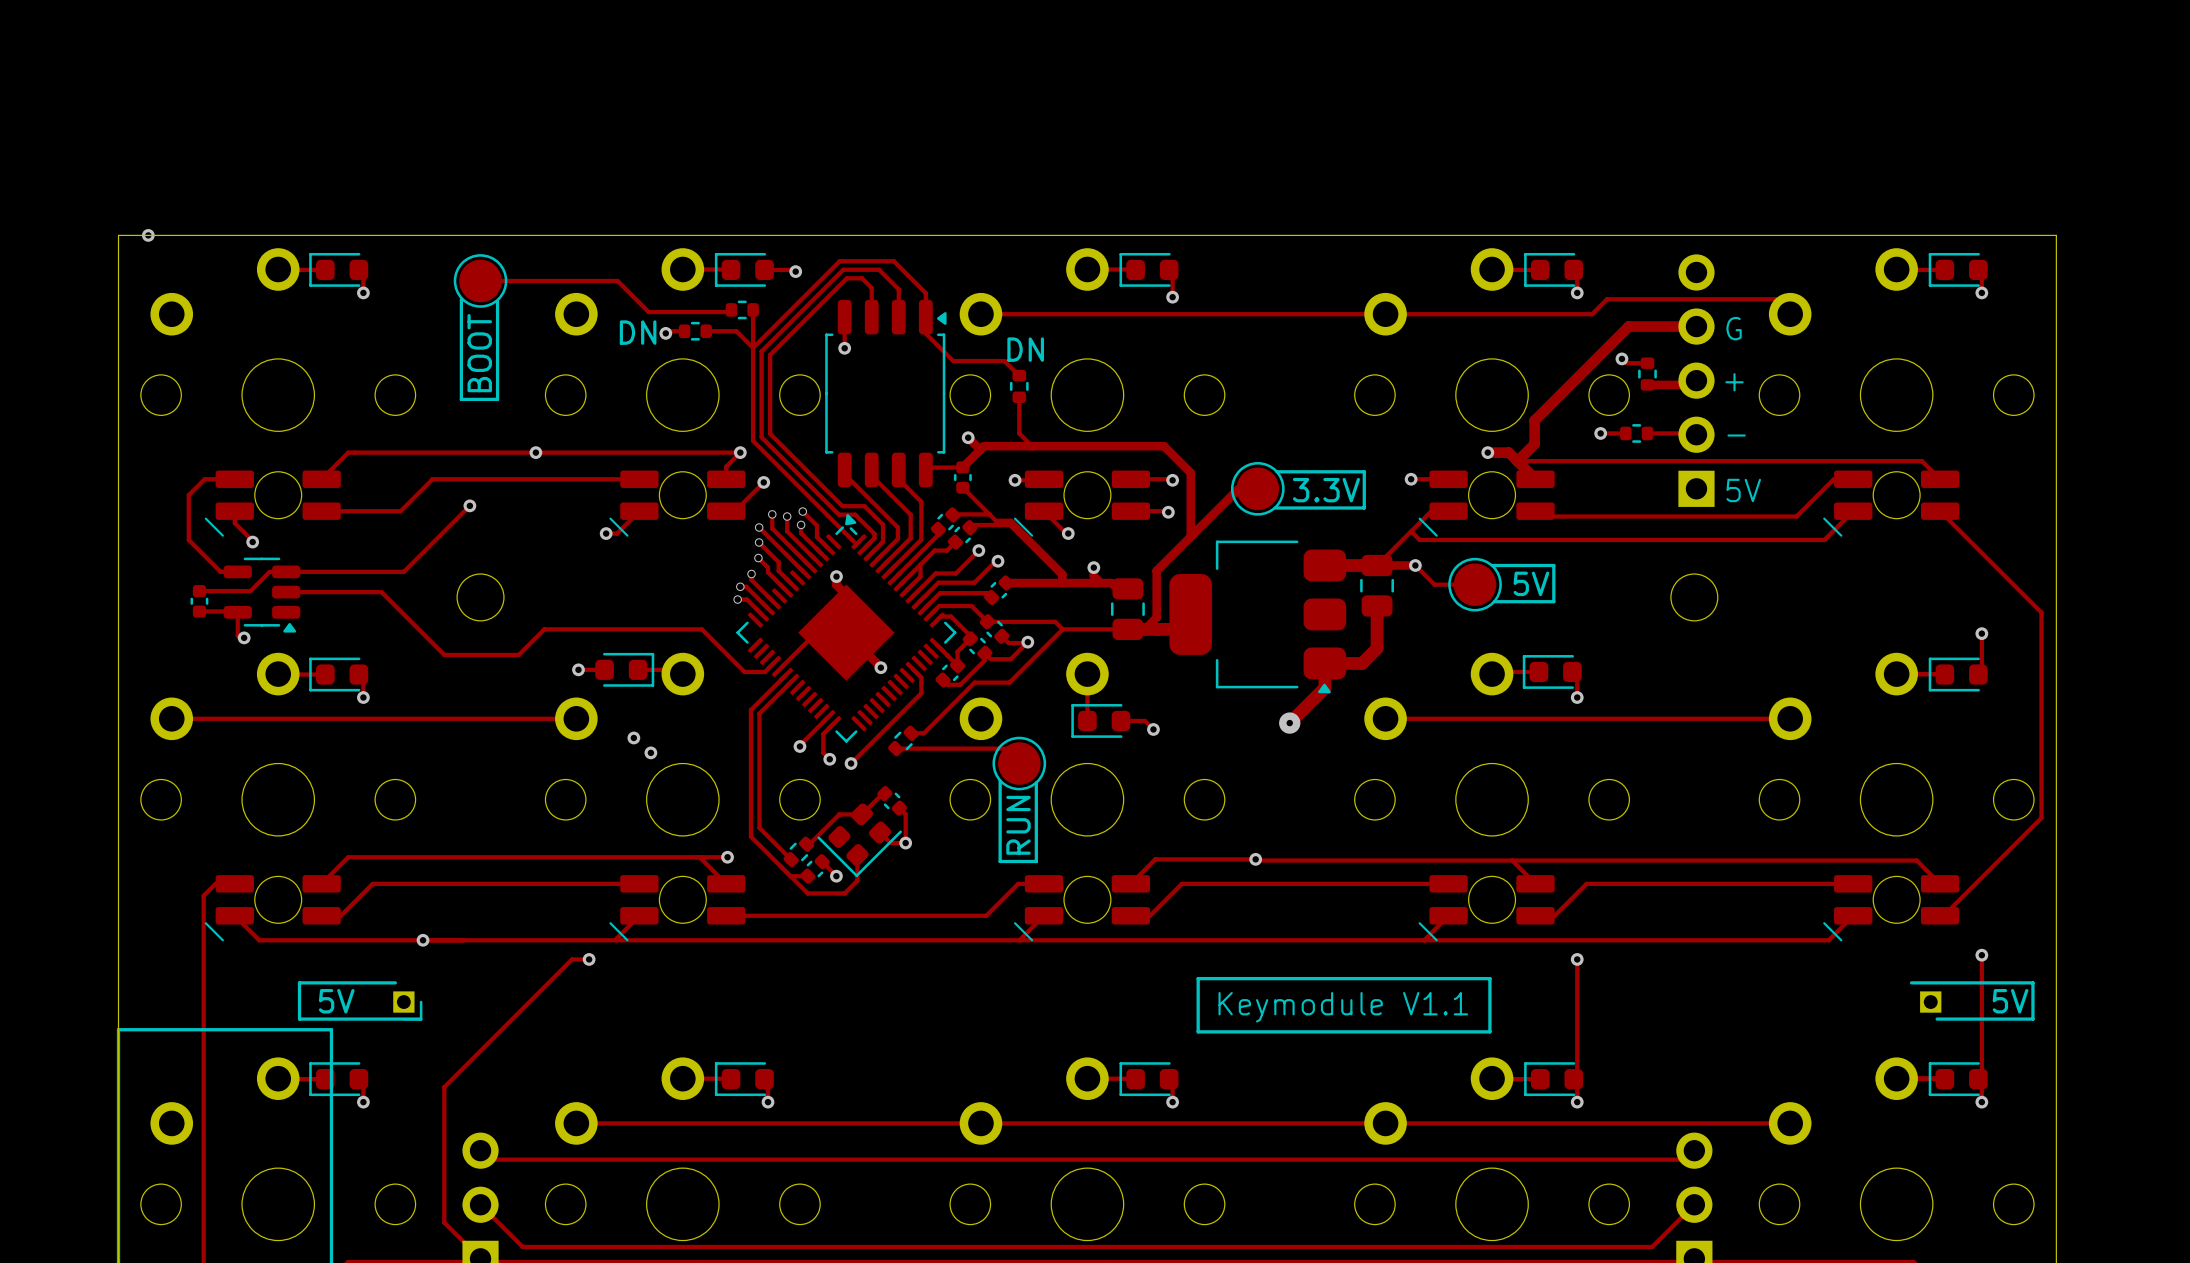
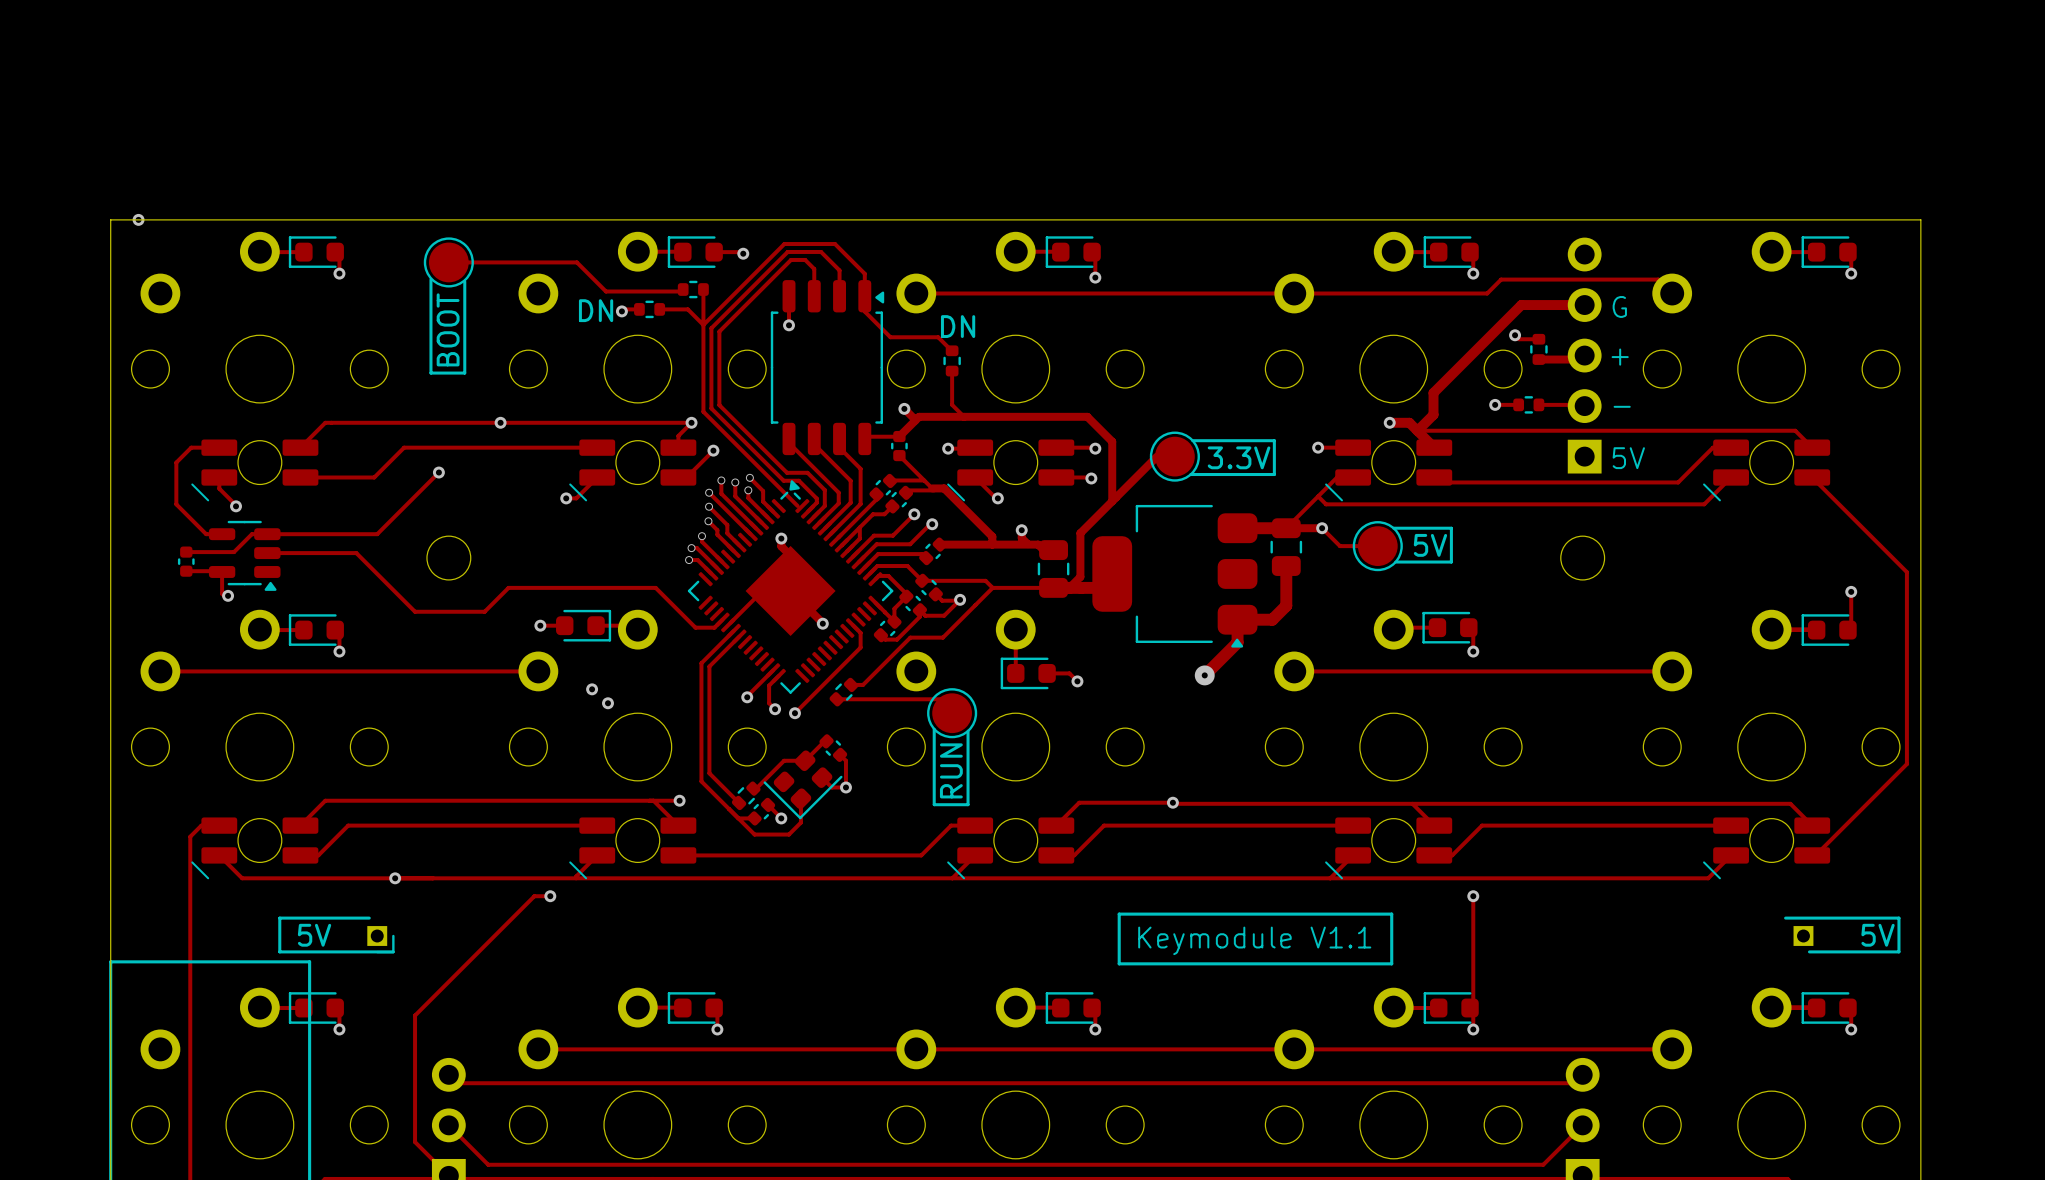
track: (1981, 955) (1981, 1075) -> none
via: (1981, 955) -> none

